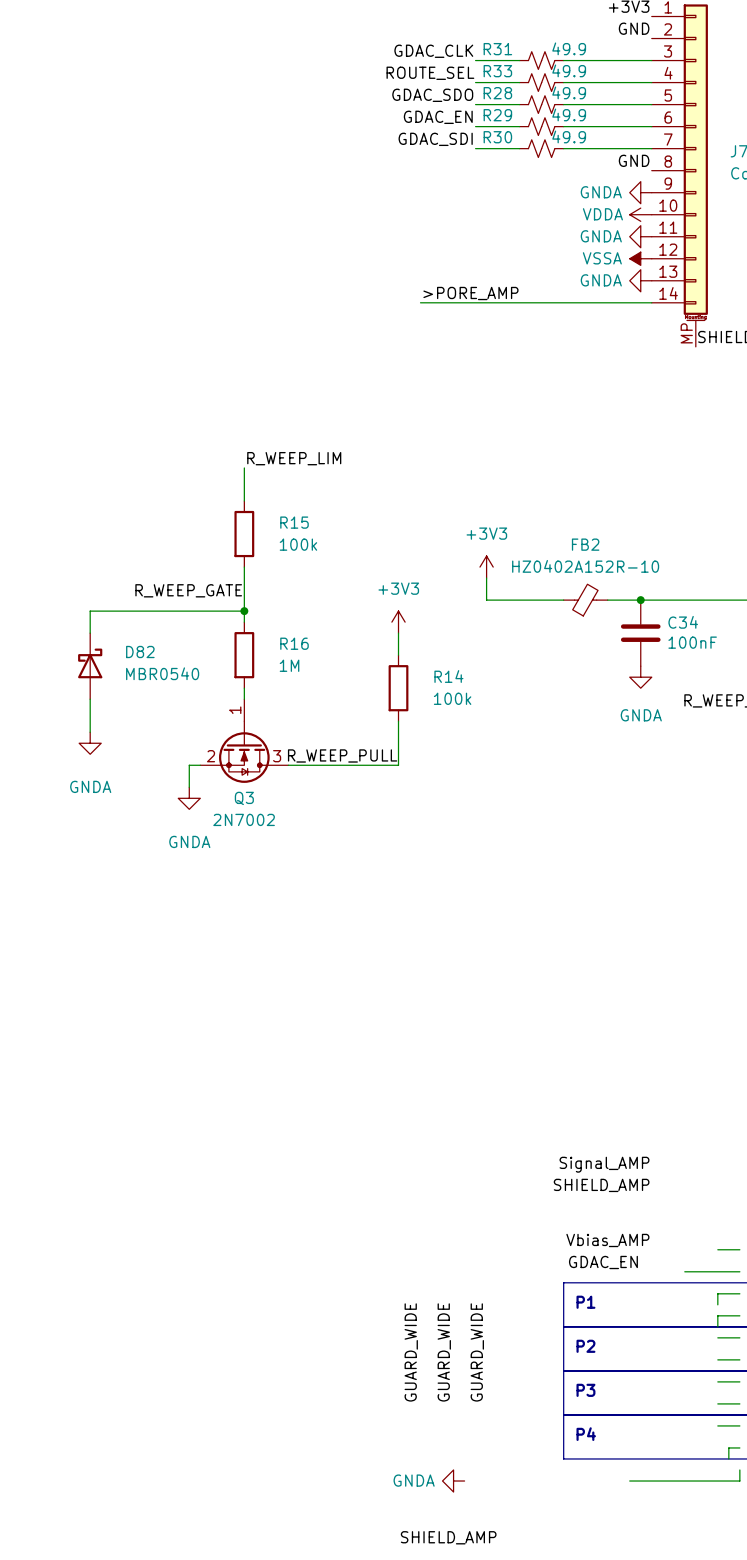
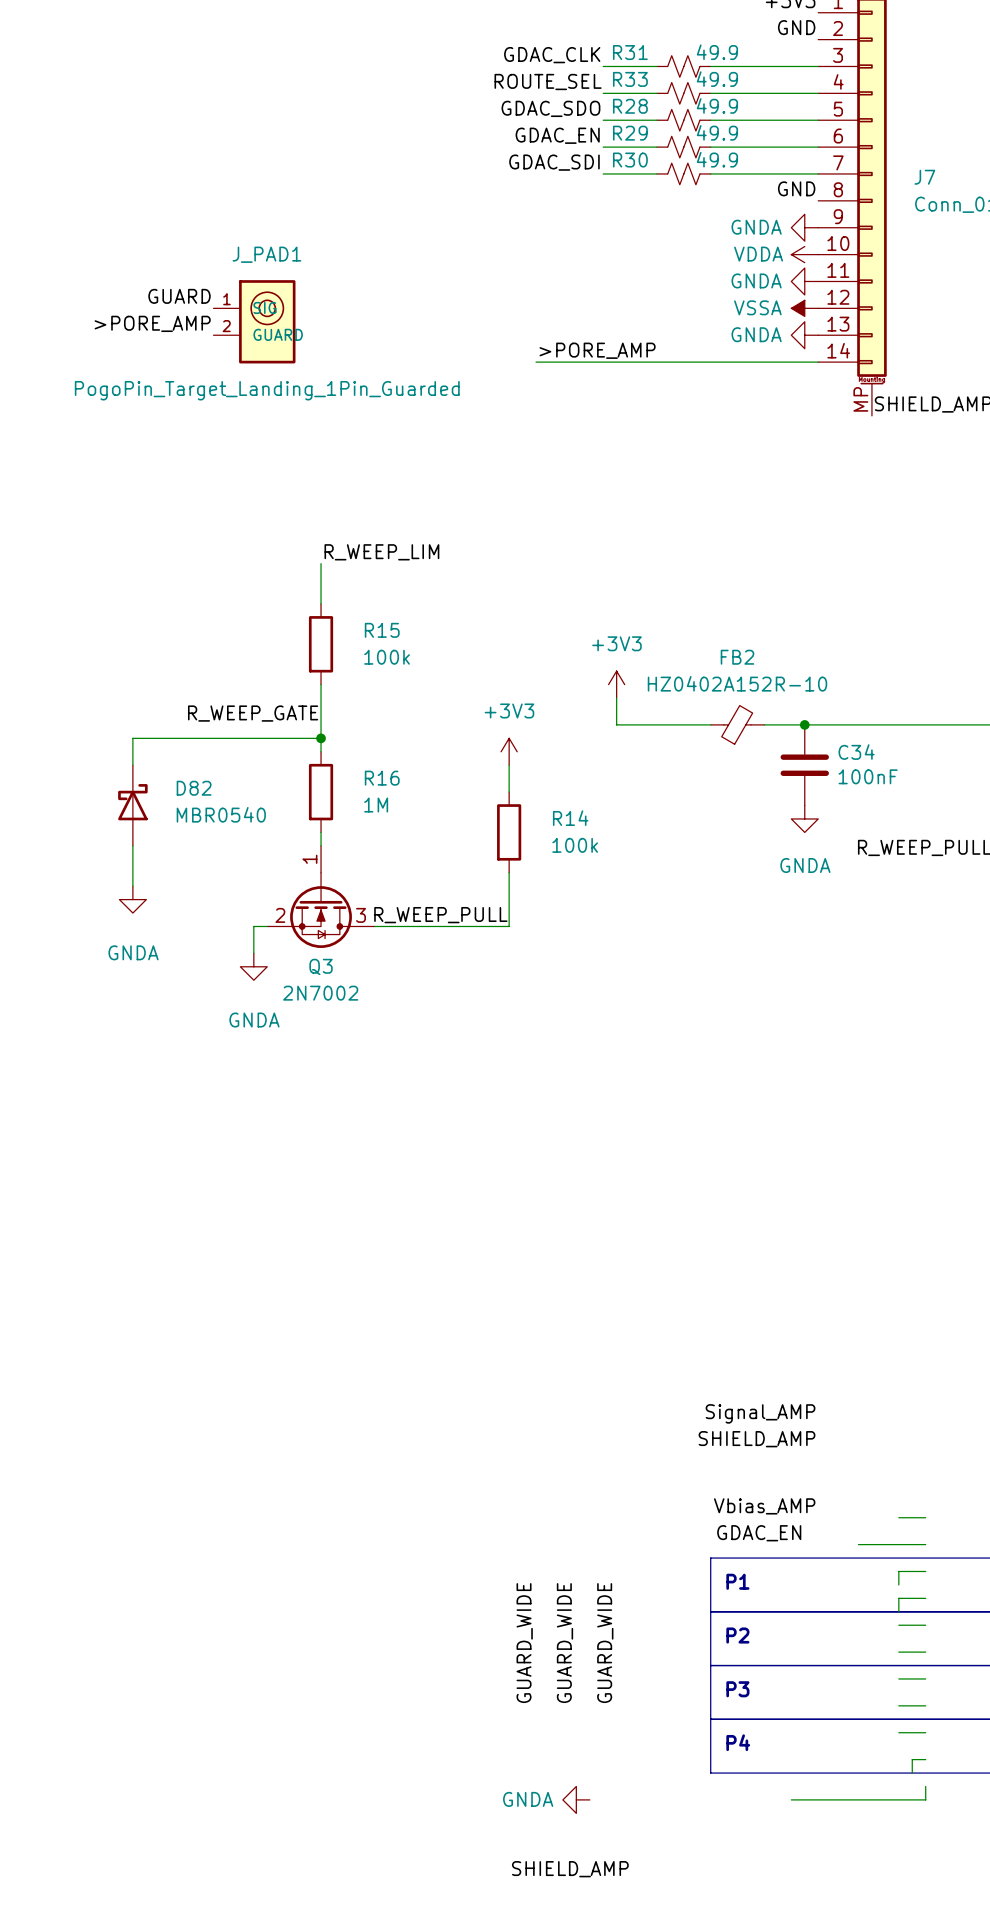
label: none -> GUARD (179, 296)
J_PAD1: none -> PogoPin_Target_Landing_1Pin_Guarded (254, 321)
label: none -> >PORE_AMP (152, 323)

